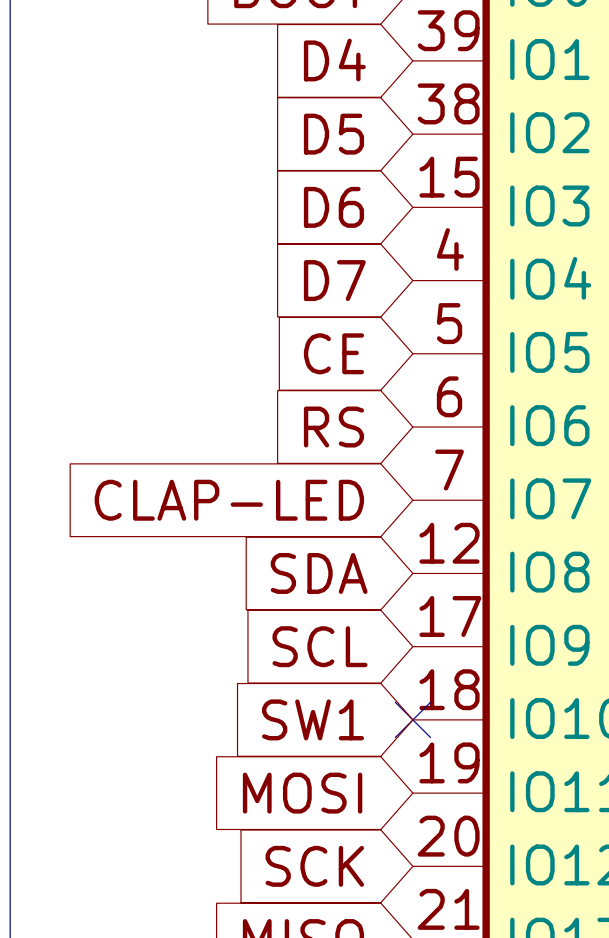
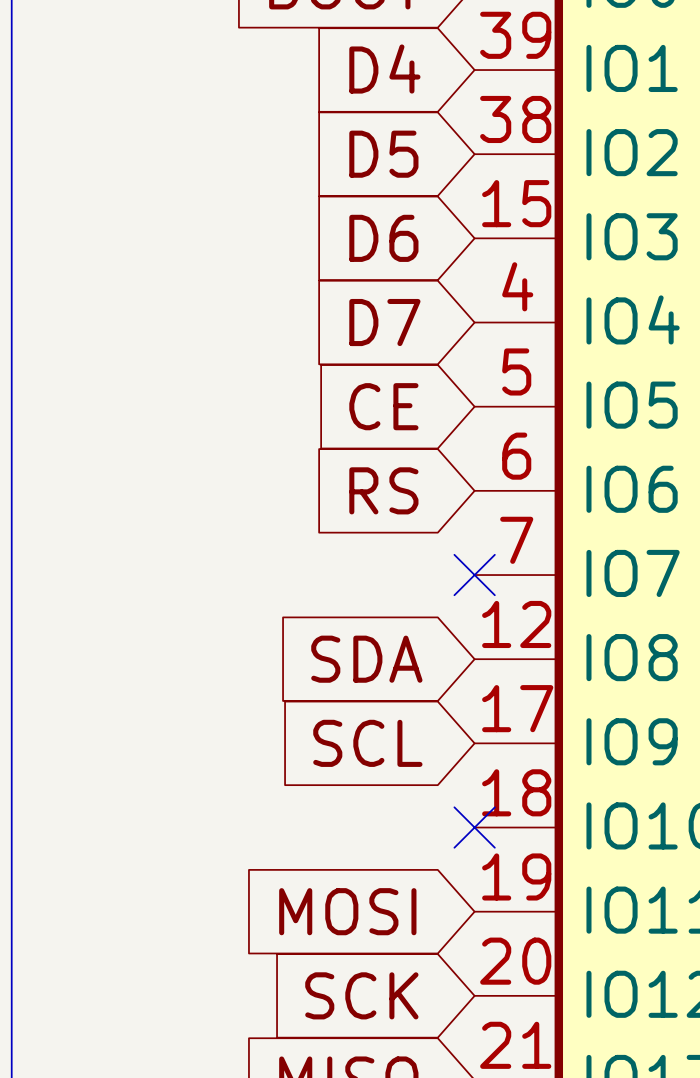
global label: CLAP-LED (229, 500) -> none
no-connect mark: none -> (474, 575)
global label: SW1 (313, 719) -> none

